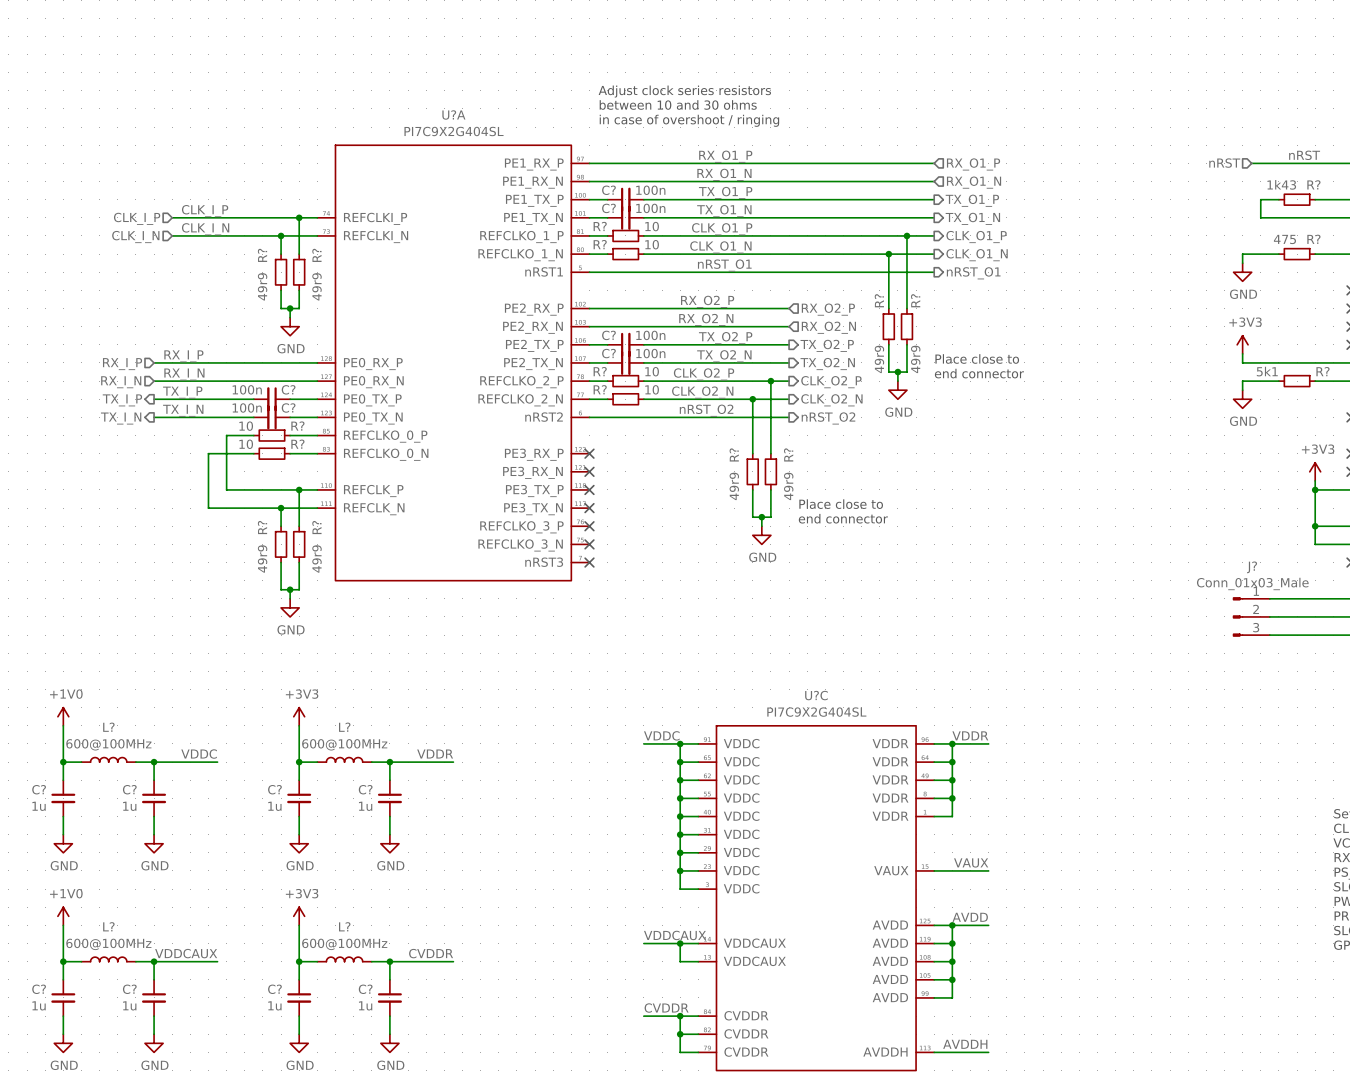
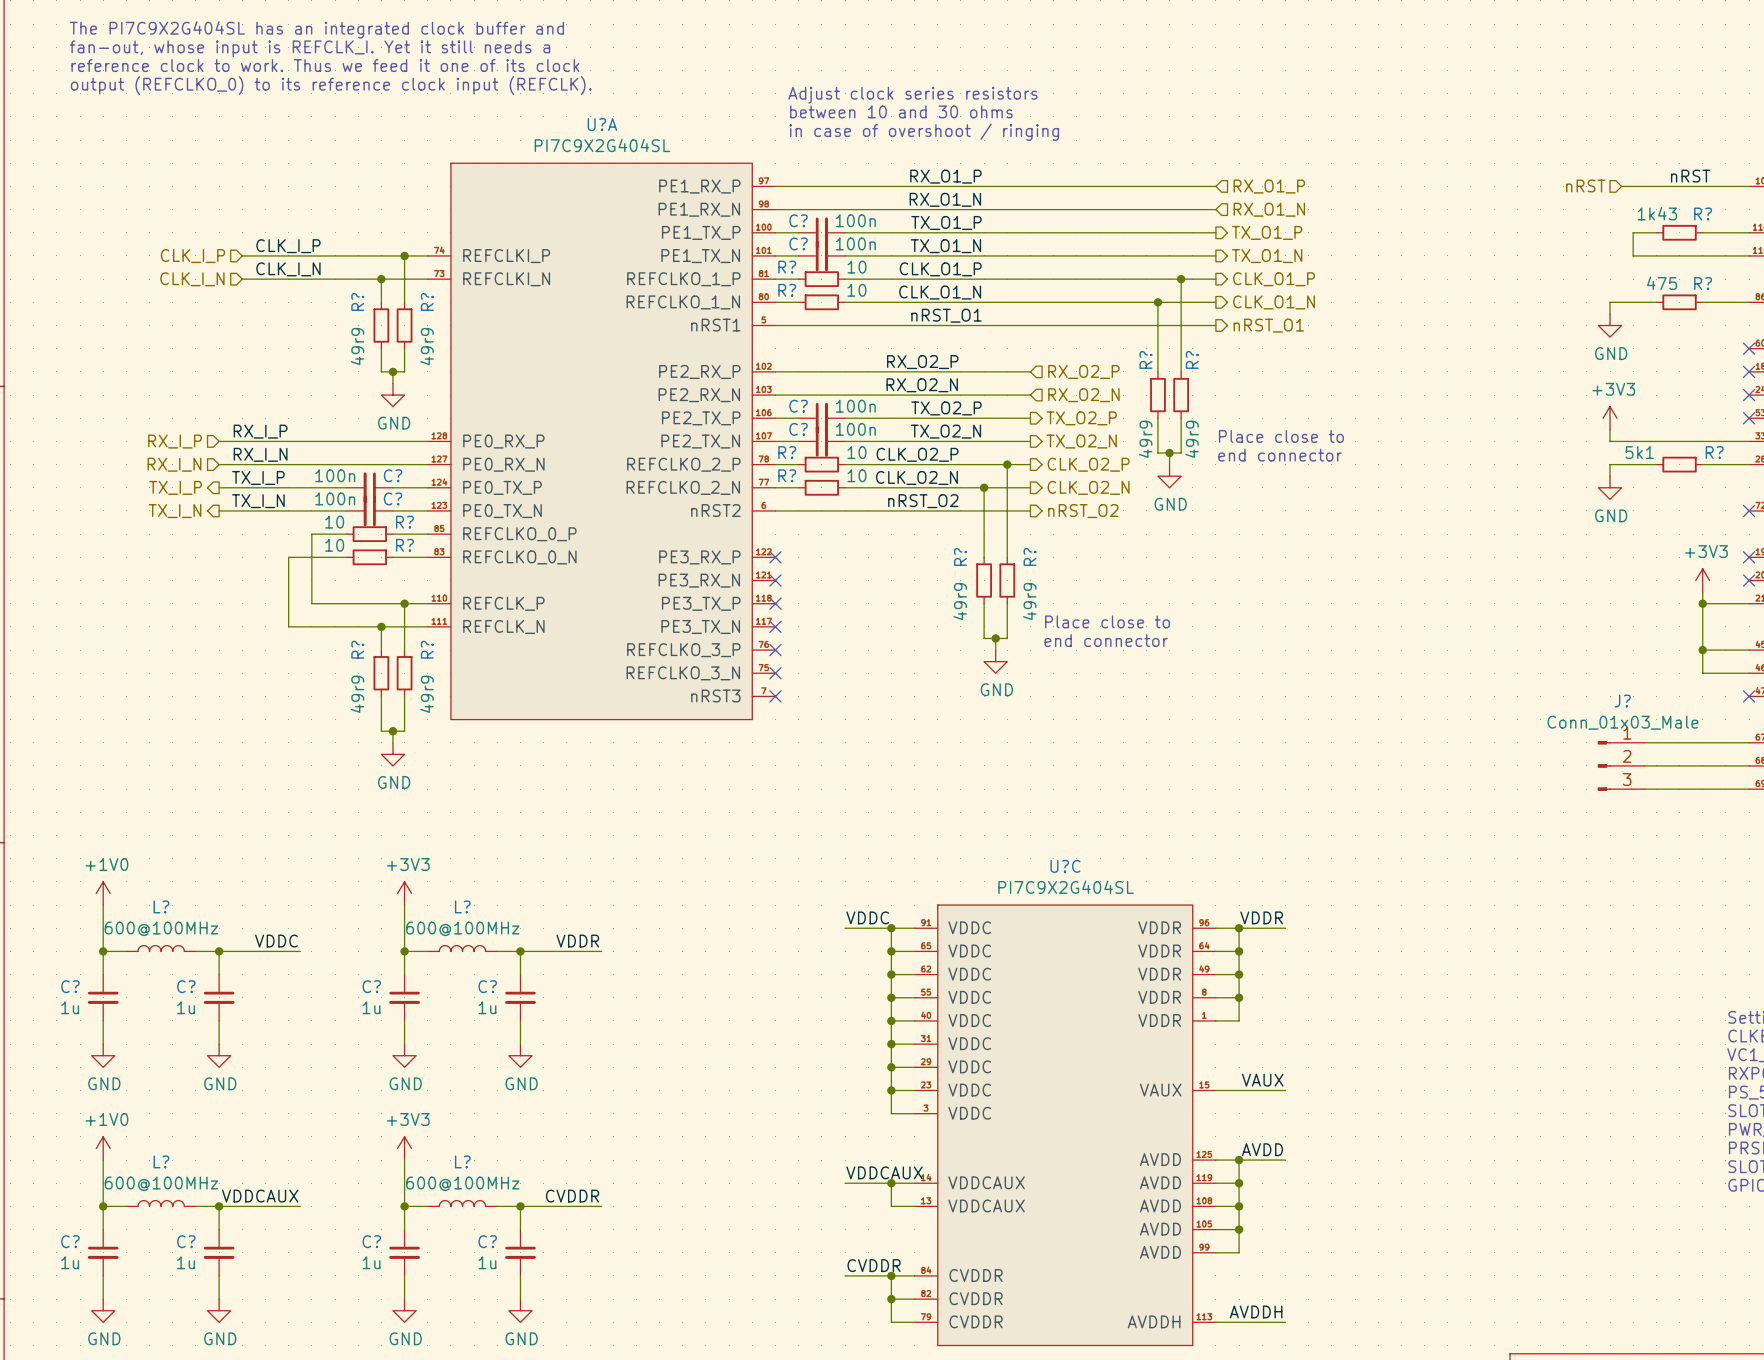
text: none -> The PI7C9X2G404SL has an integrated clock buffer and (316, 29)
text: none -> fan-out, whose input is REFCLK_I. Yet it still needs a (309, 48)
text: none -> reference clock to work. Thus we feed it one of its clock (325, 65)
text: none -> output (REFCLKO_0) to its reference clock input (REFCLK). (331, 85)

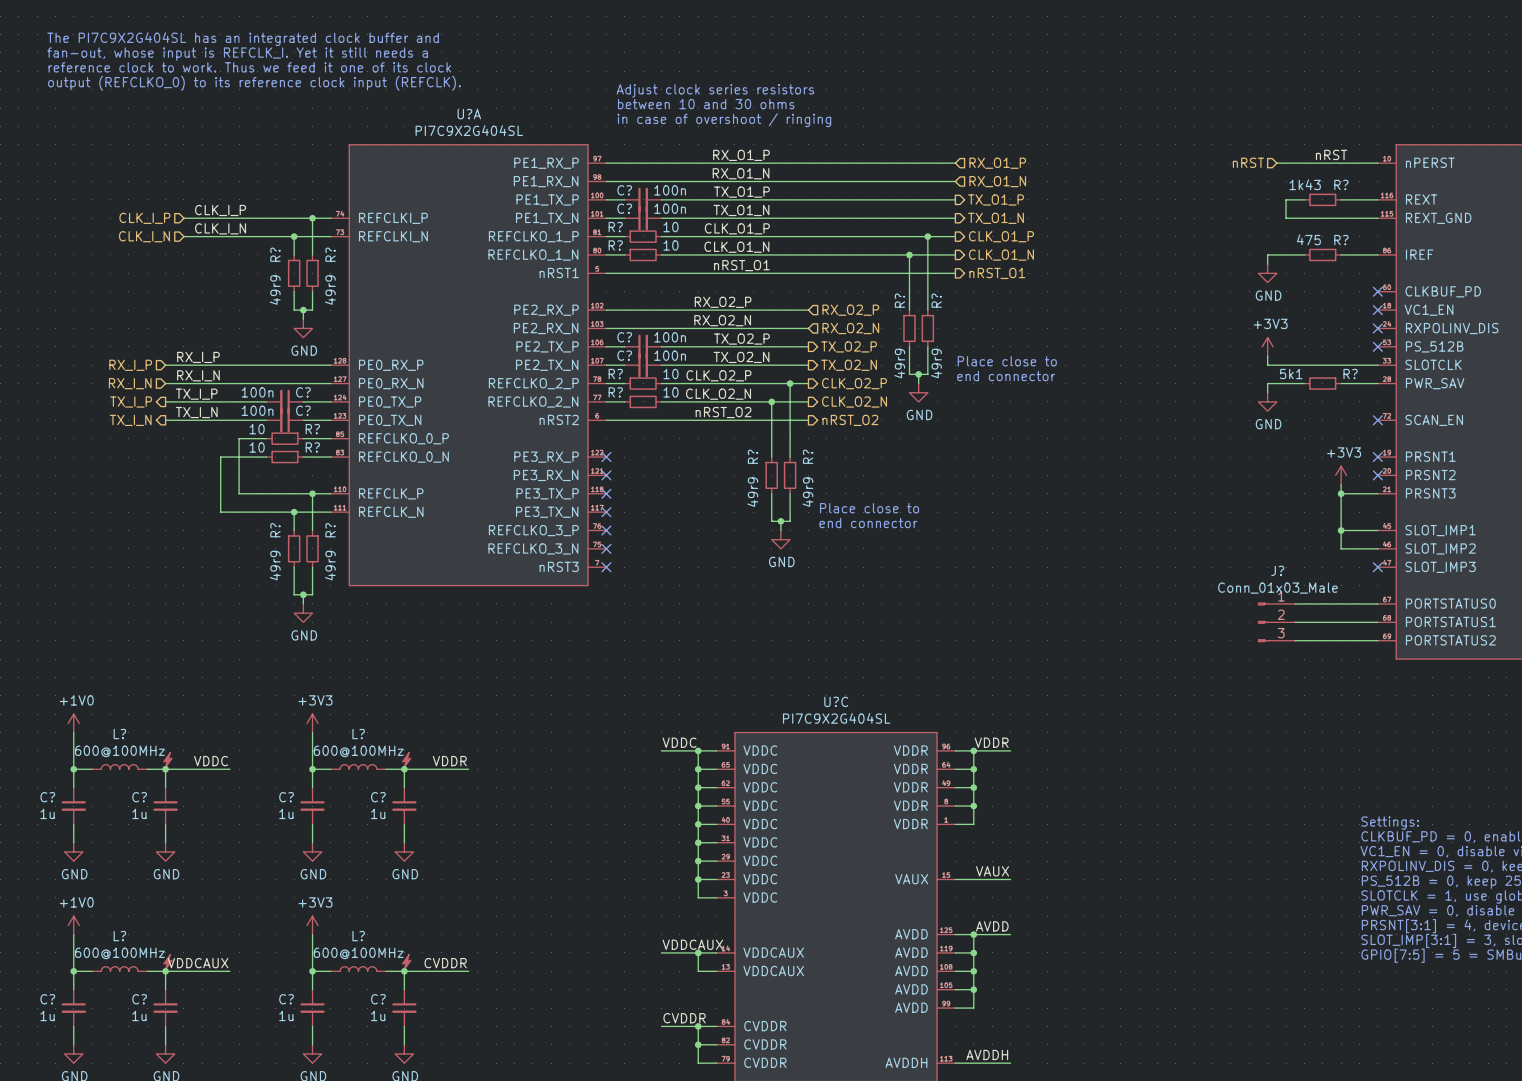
power symbol: none -> (167, 760)
power symbol: none -> (406, 760)
power symbol: none -> (167, 962)
power symbol: none -> (406, 962)

